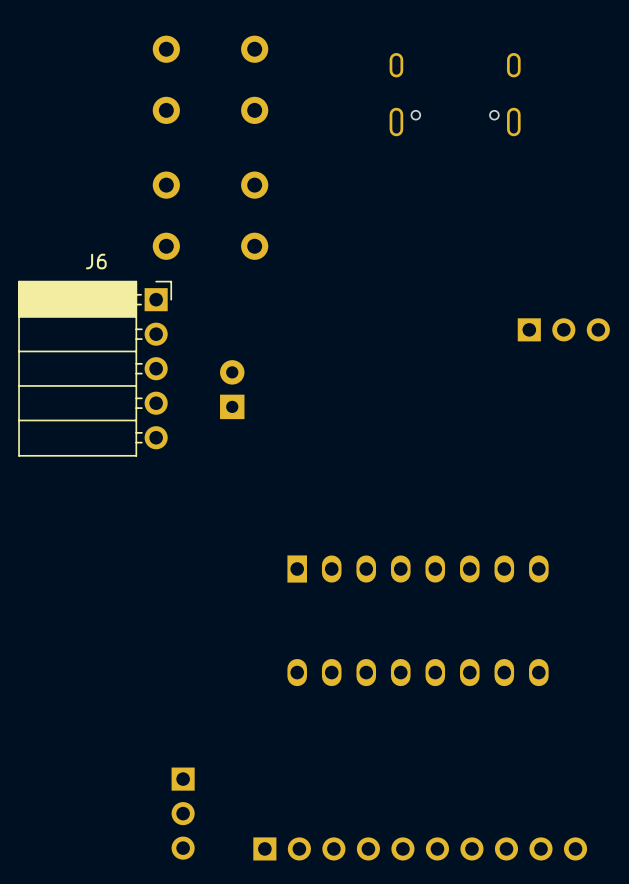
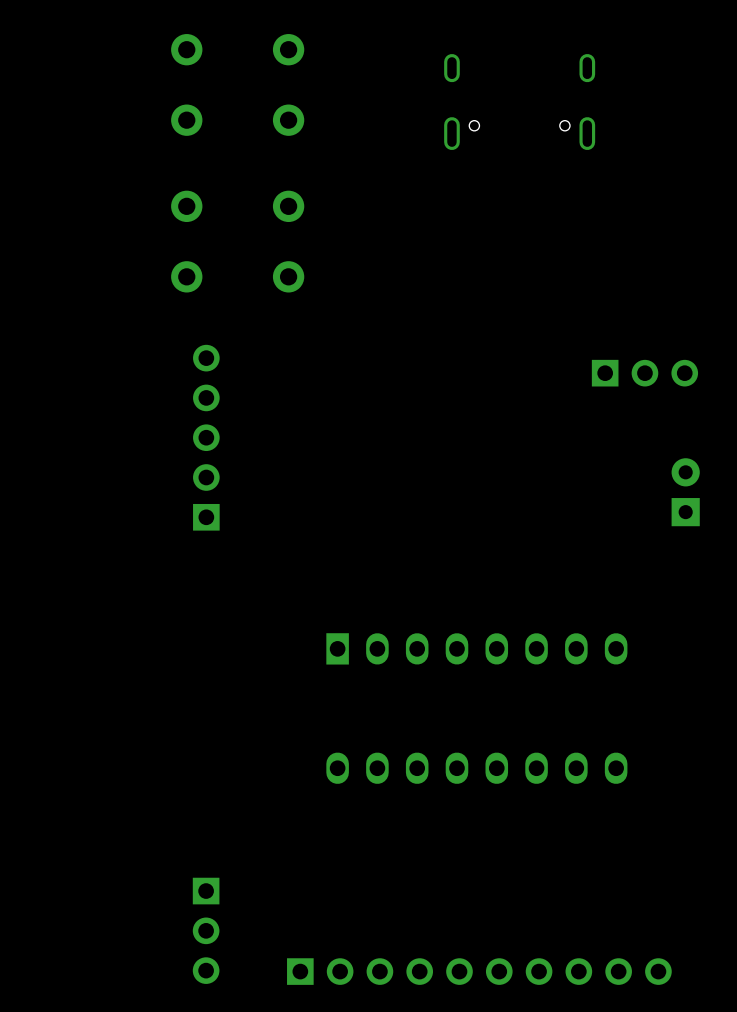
J6 side: bottom (95, 368) -> top (206, 437)
part: (232, 389) -> none
part: none -> (685, 492)

